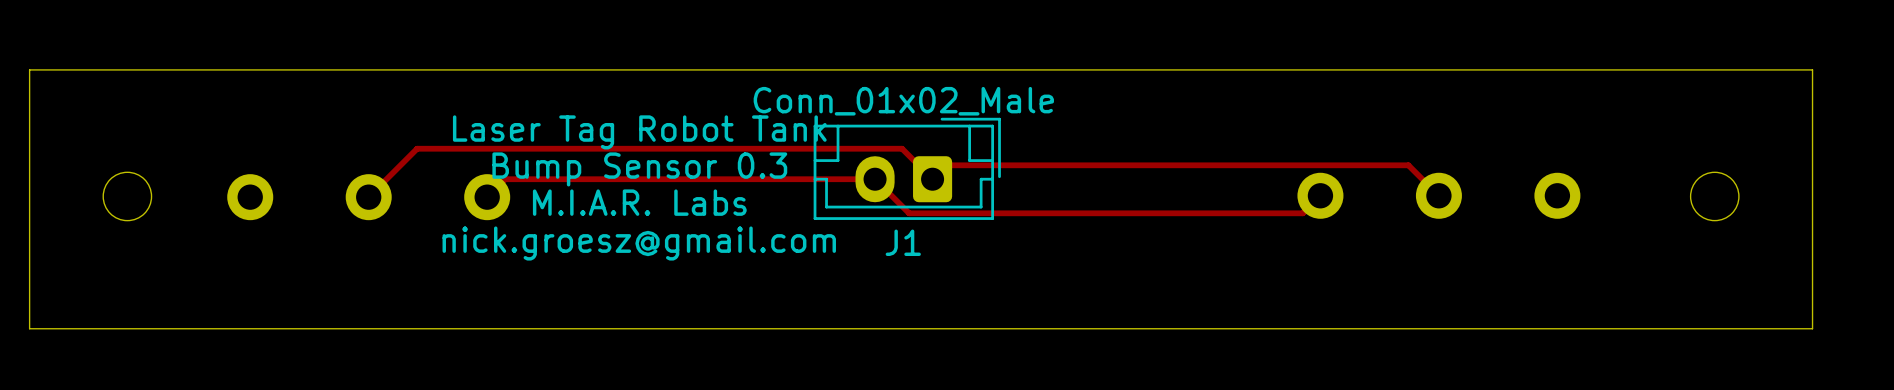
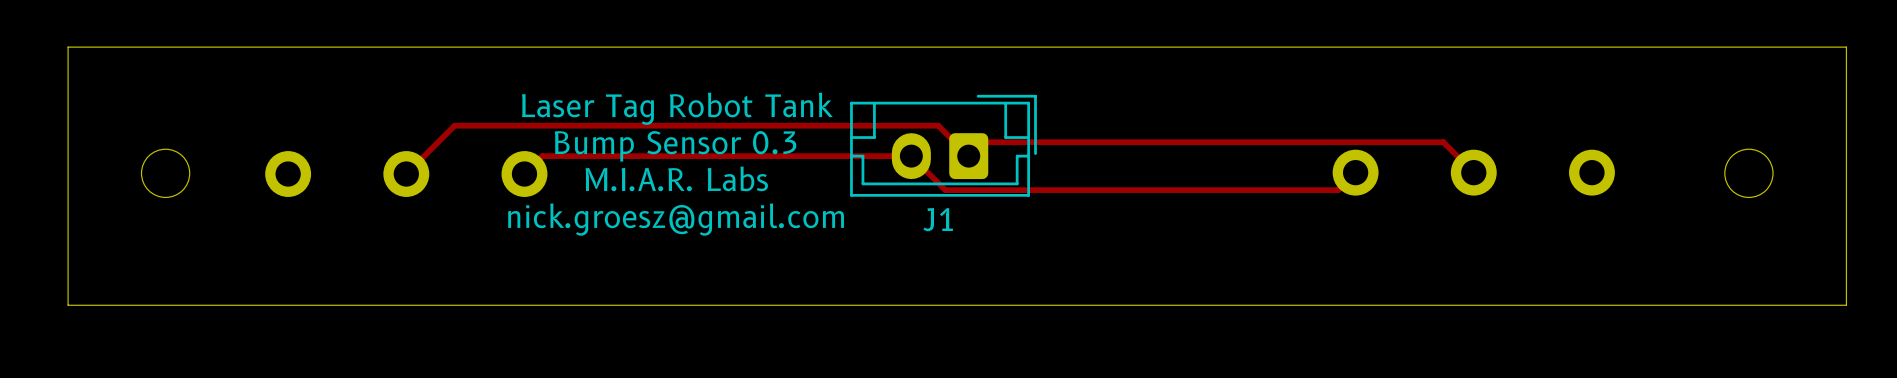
J1 value: Conn_01x02_Male (903, 101) -> none

